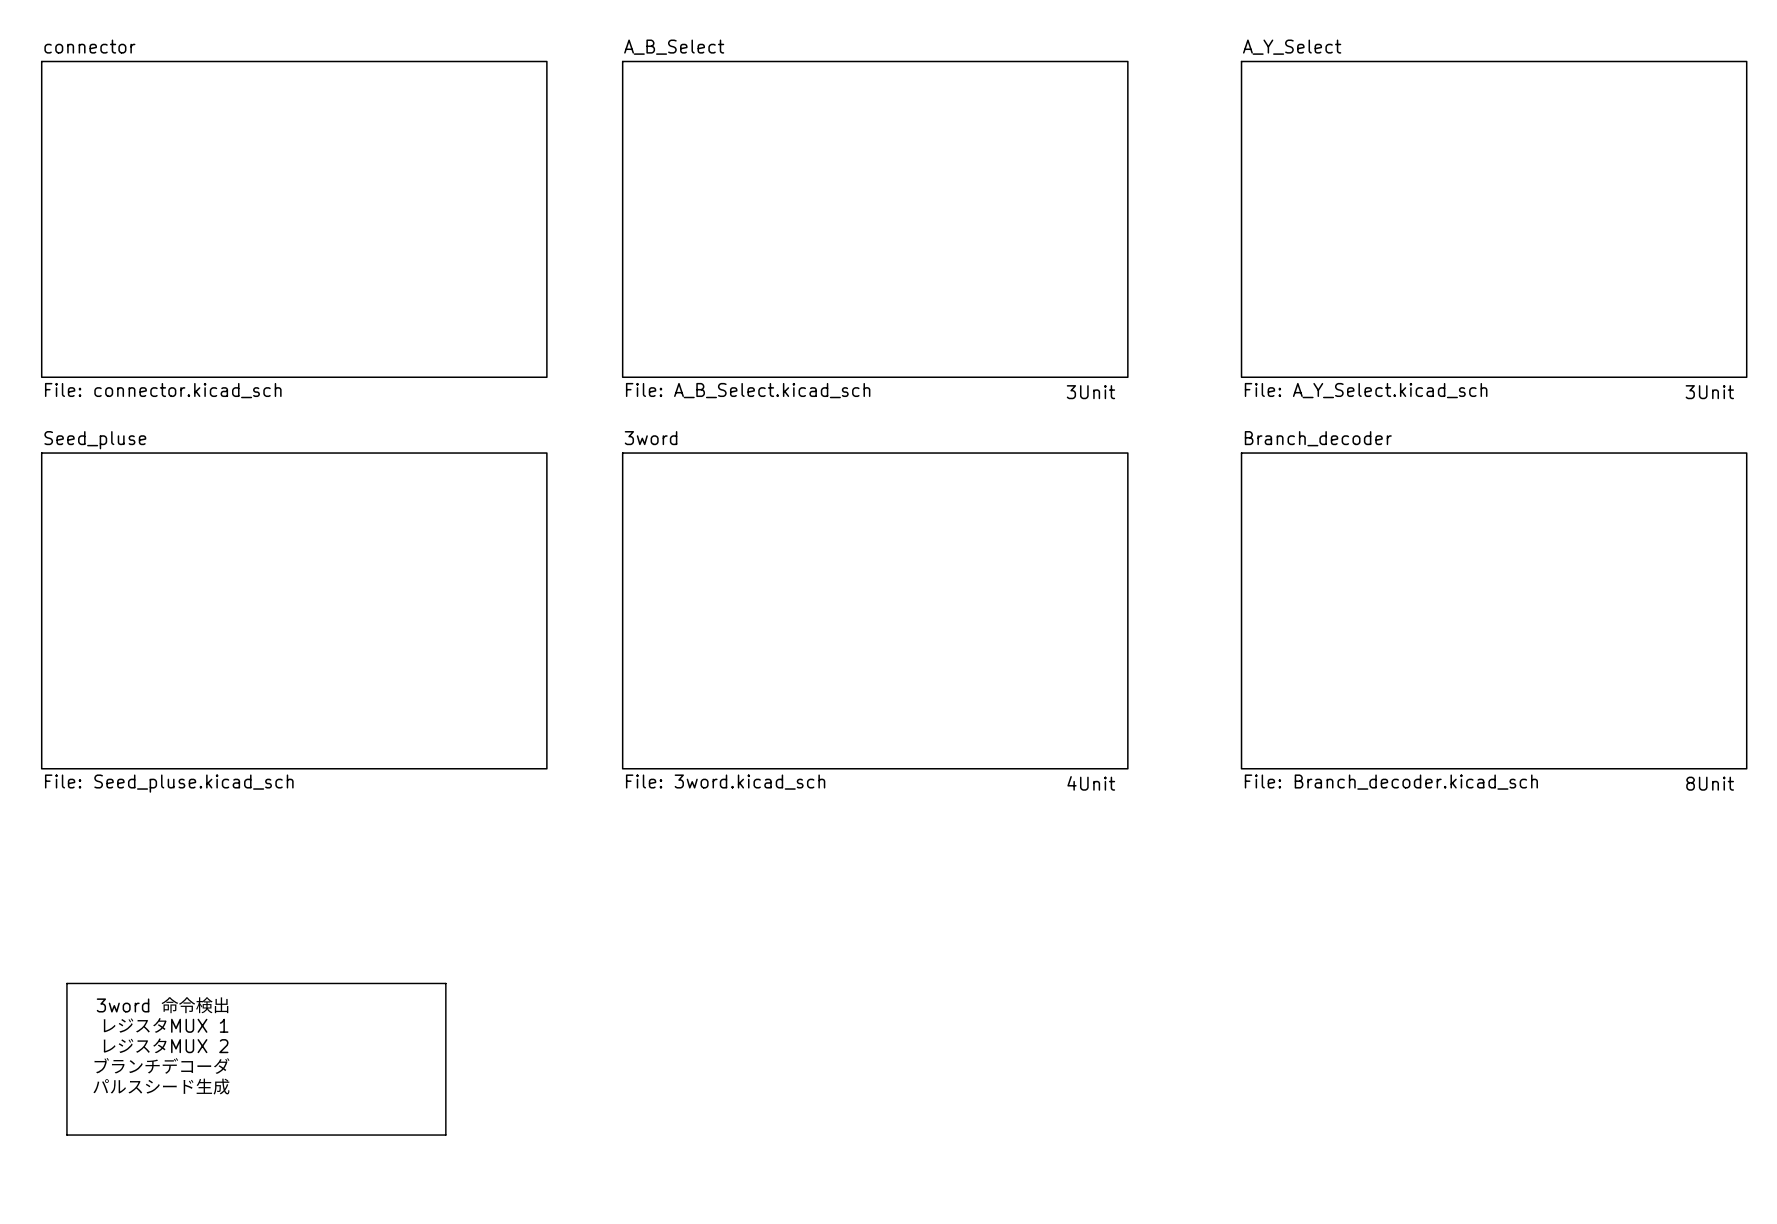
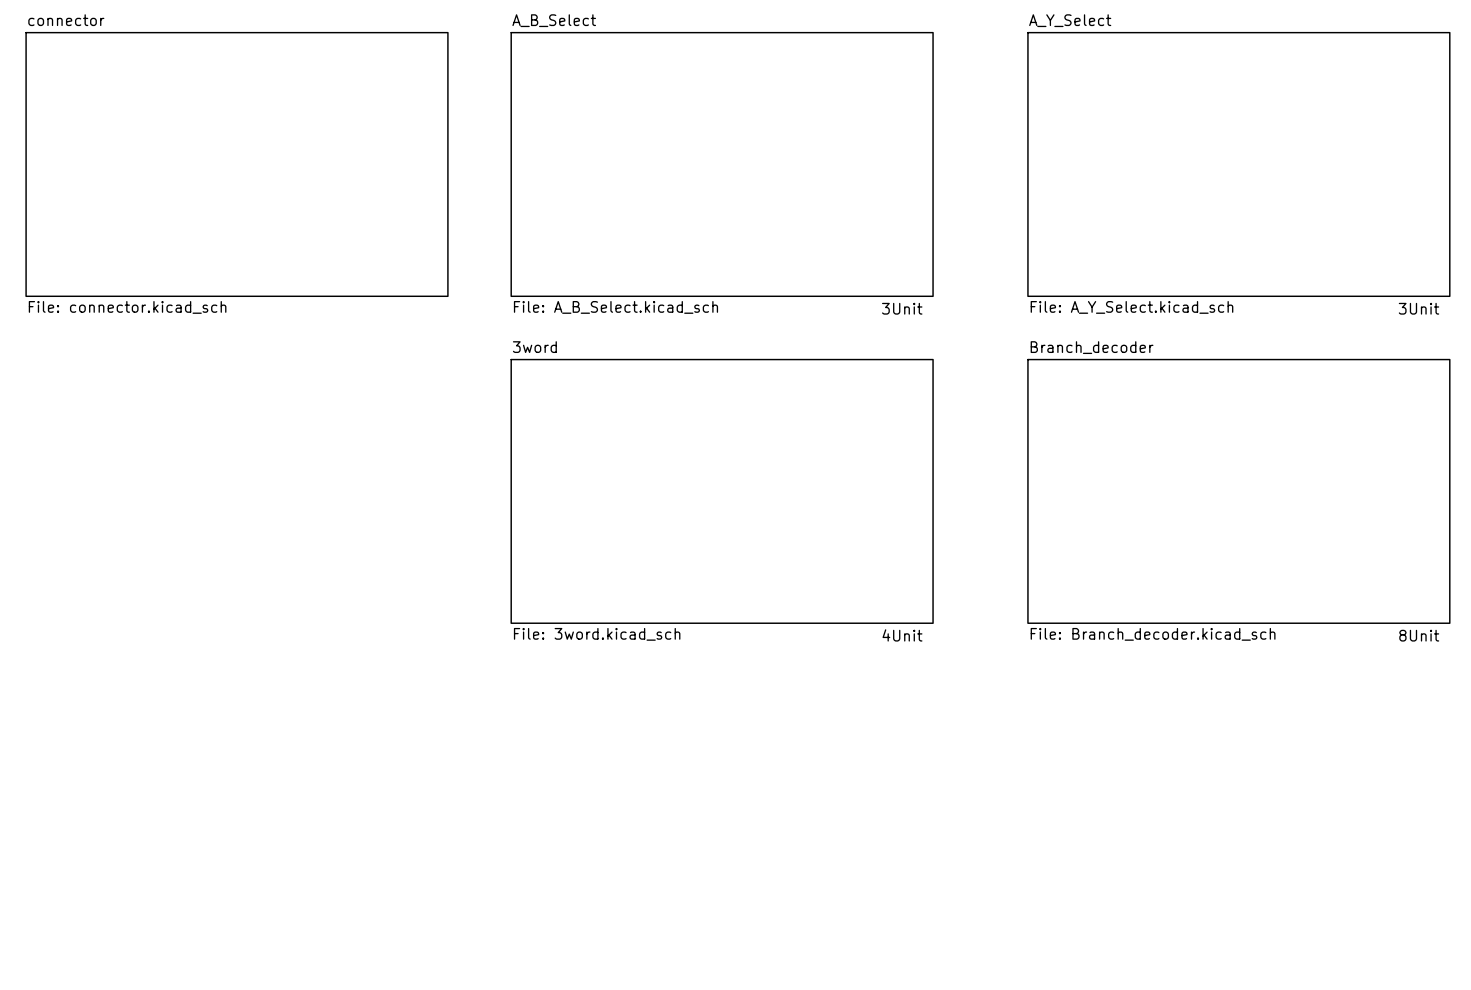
sheet Seed_pluse: File: Seed_pluse.kicad_sch (294, 610) -> none
line: (66, 983) (445, 983) (445, 1135) (66, 1135) (66, 983) -> none
text: 3word 命令検出 (162, 1005) -> none
text: レジスタMUX 1 (165, 1025) -> none
text: レジスタMUX 2 (165, 1045) -> none
text: ブランチデコーダ (161, 1065) -> none
text: パルスシード生成 (161, 1086) -> none

